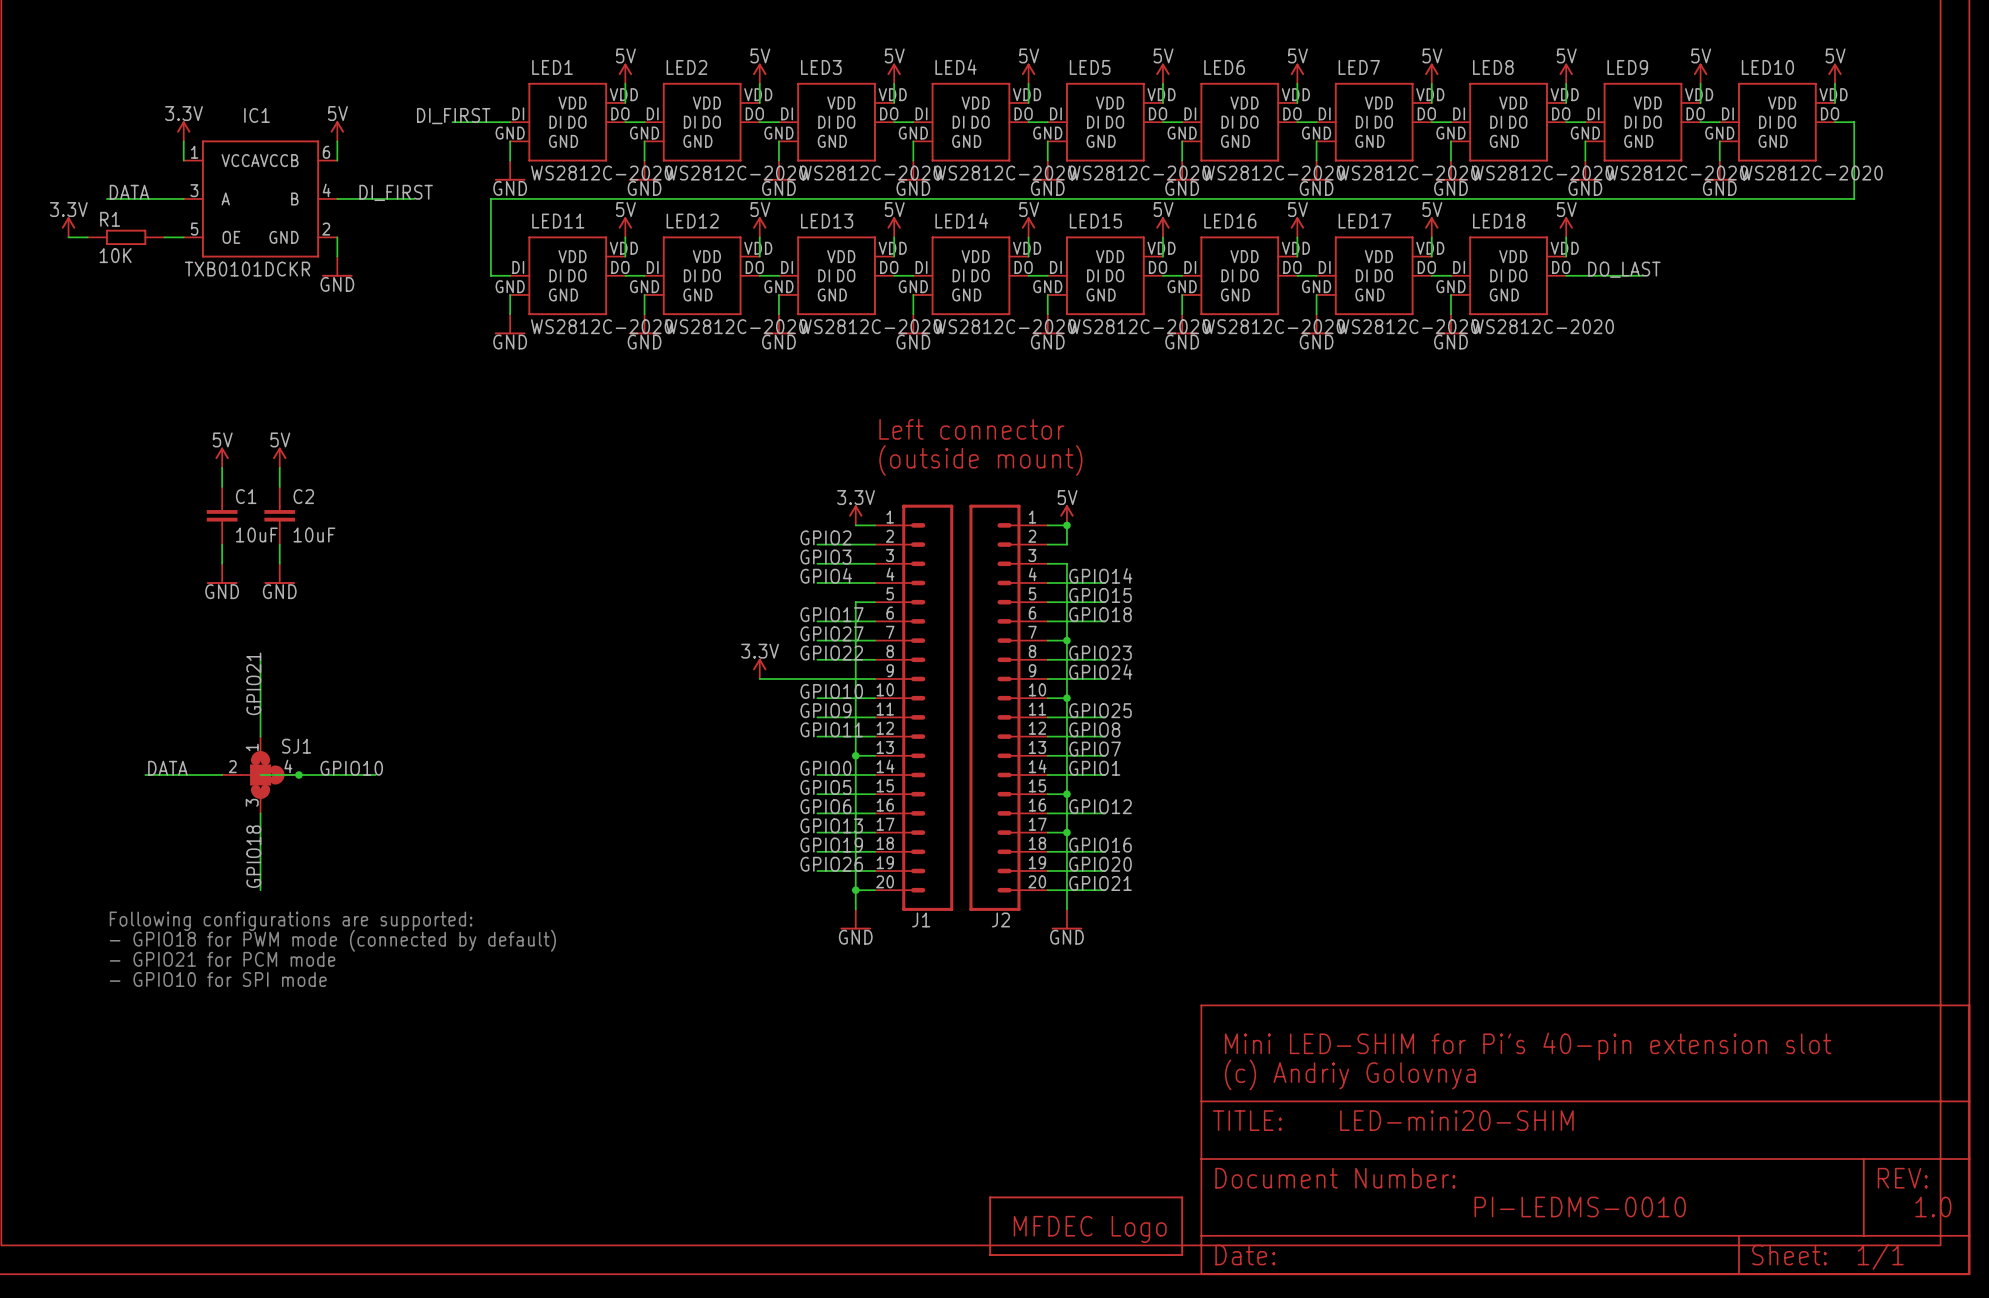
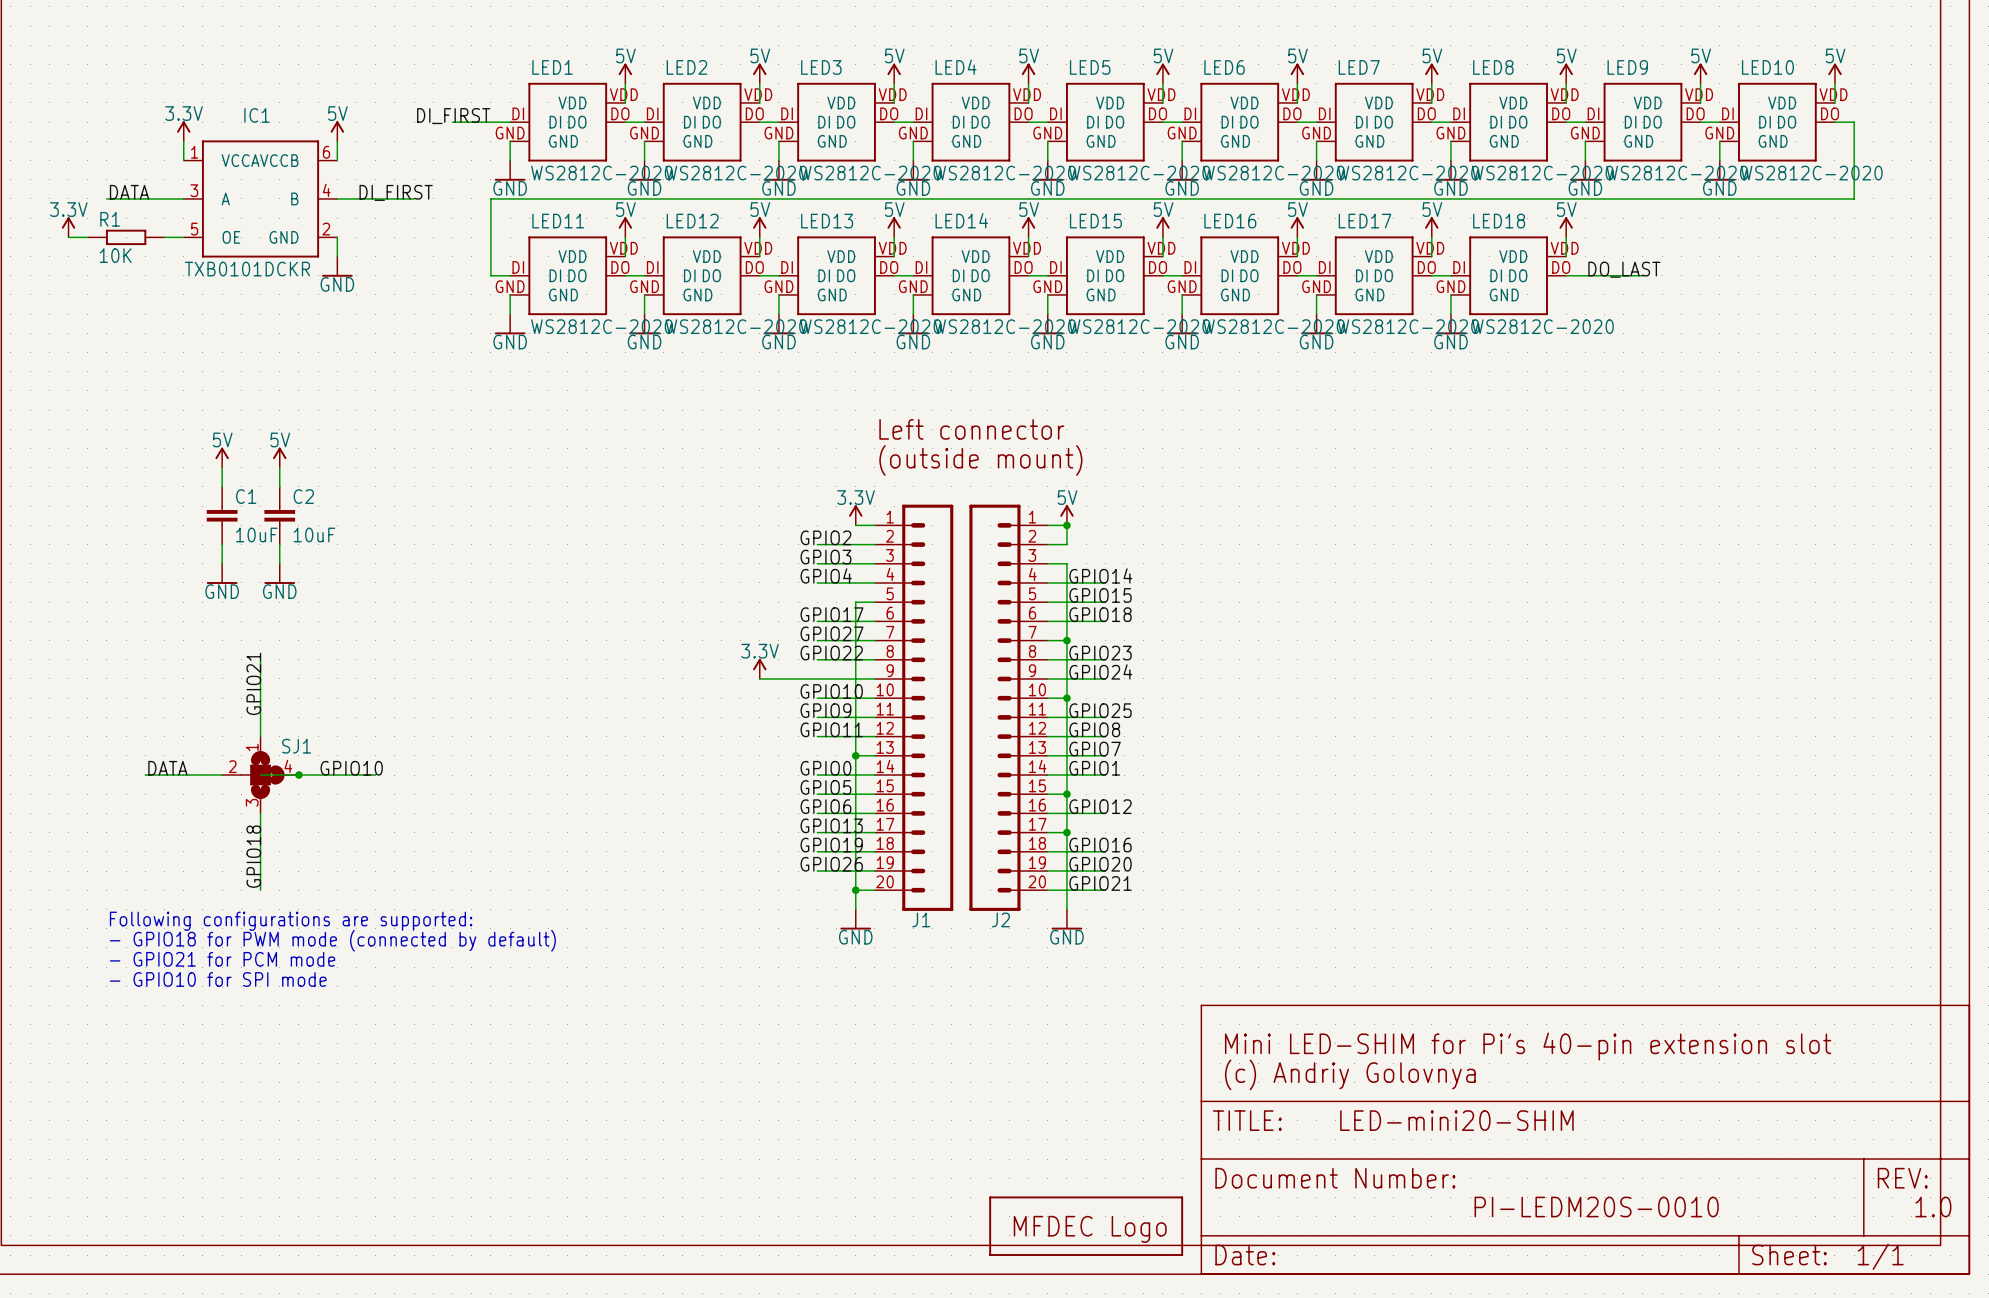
text: PI-LEDMS-0010 (1580, 1207) -> PI-LEDM20S-0010 (1596, 1207)

